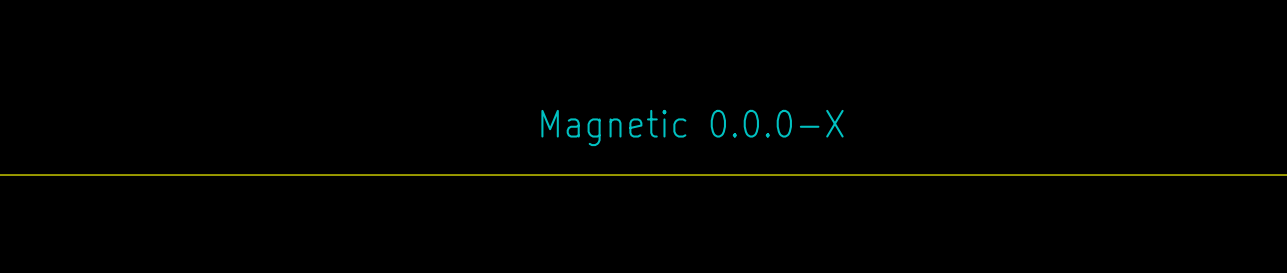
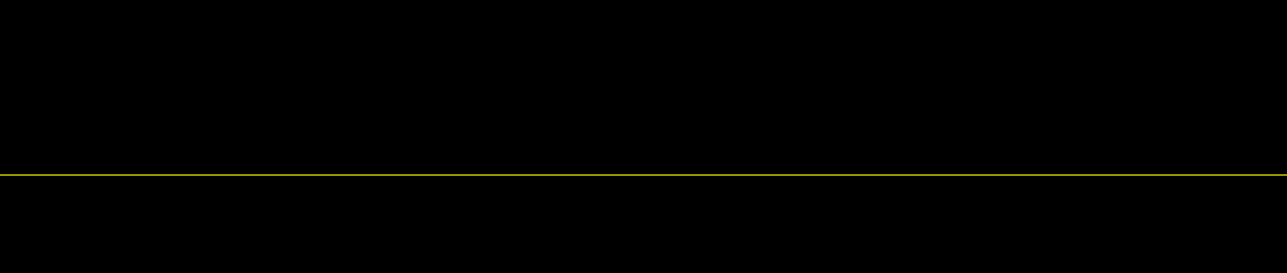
text: Magnetic 0.0.0-X (692, 127) -> none

